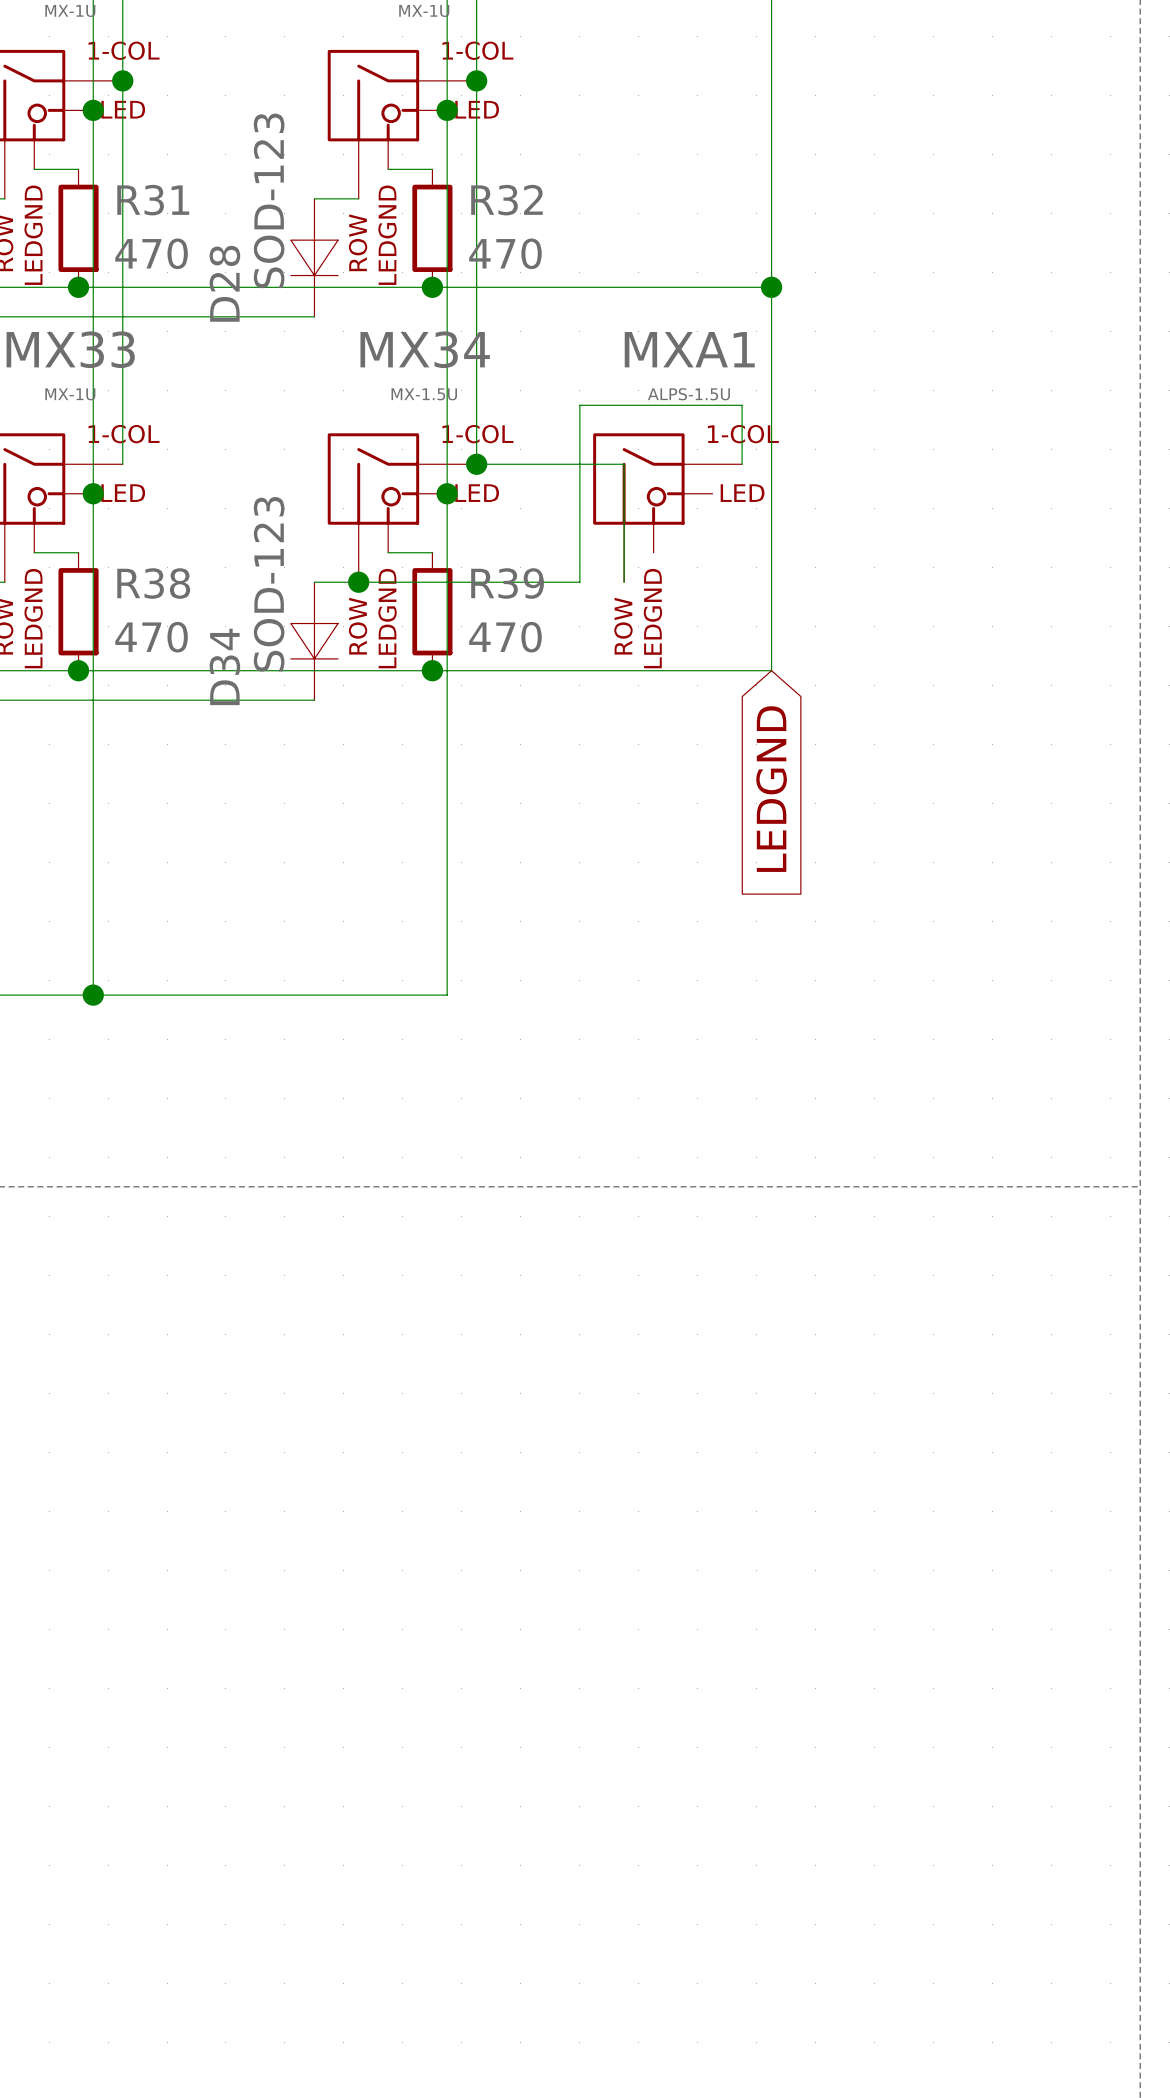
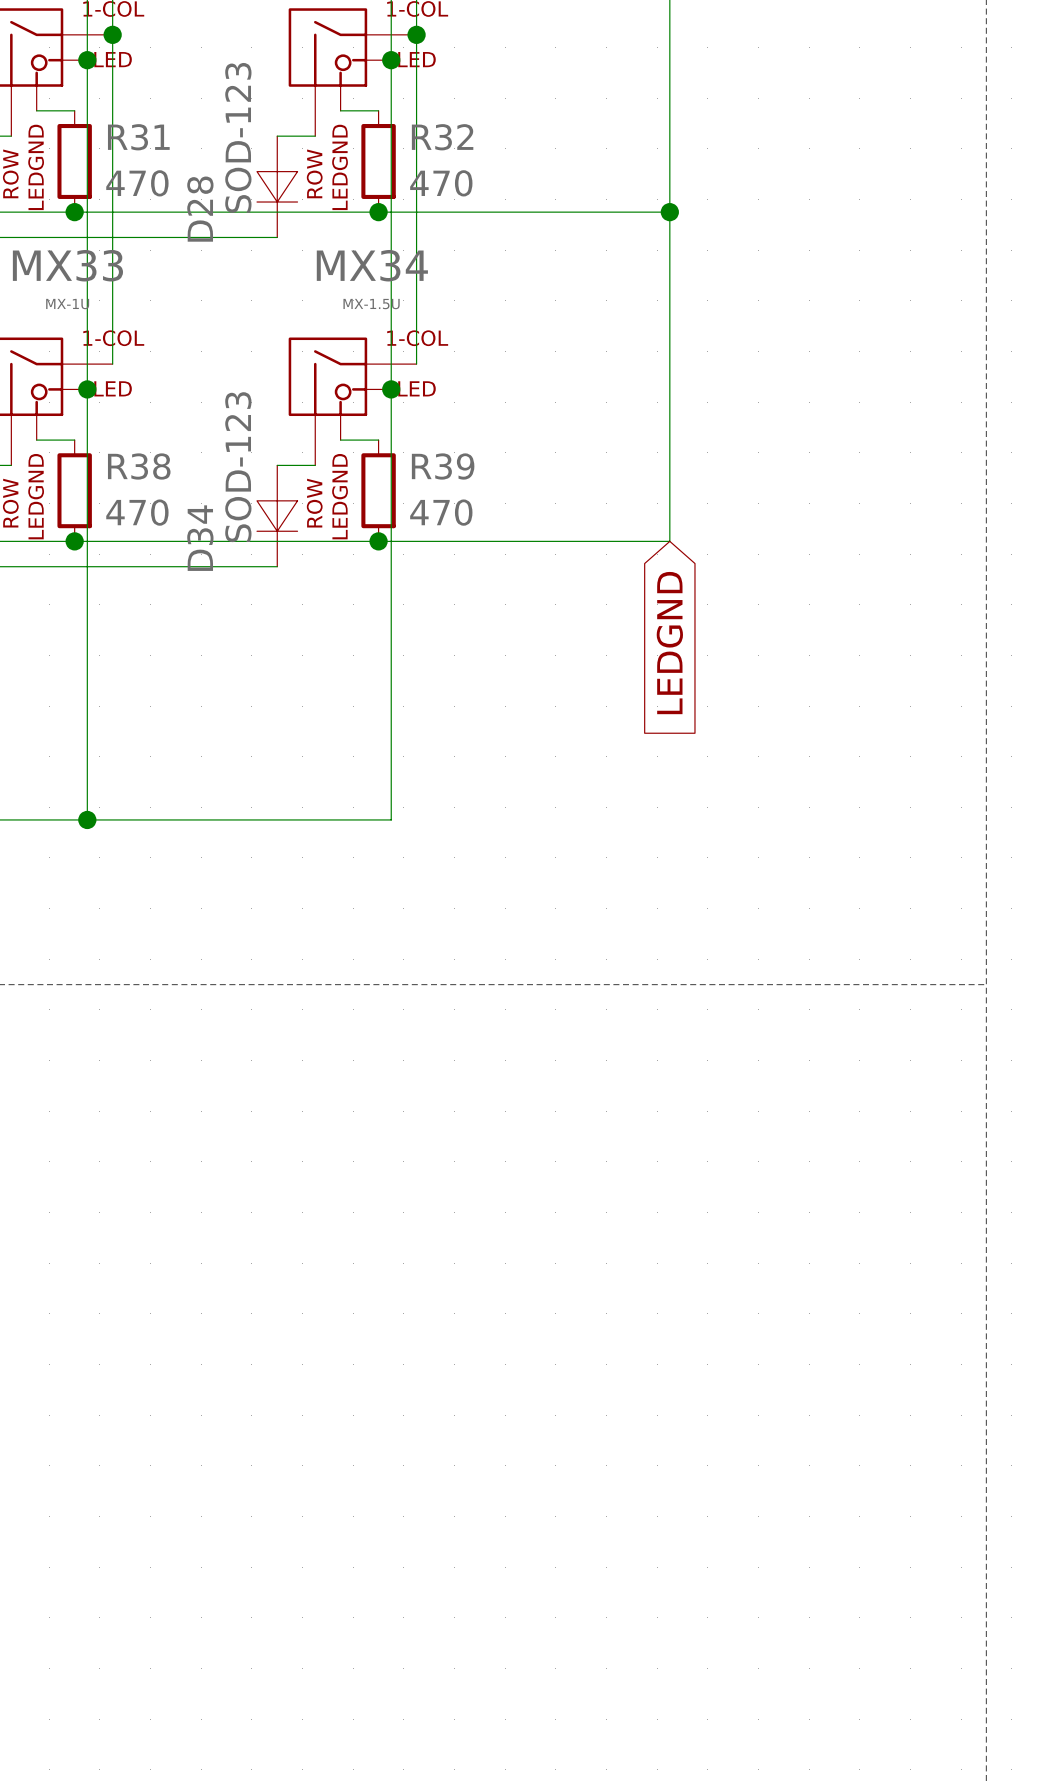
wire: (476, 464) (624, 464) (624, 582) -> none
junction: (476, 464) -> none
wire: (742, 464) (742, 405) (579, 405) (579, 582) (358, 582) -> none
MXA1: ALPS-1.5U (667, 507) -> none
junction: (358, 582) -> none

